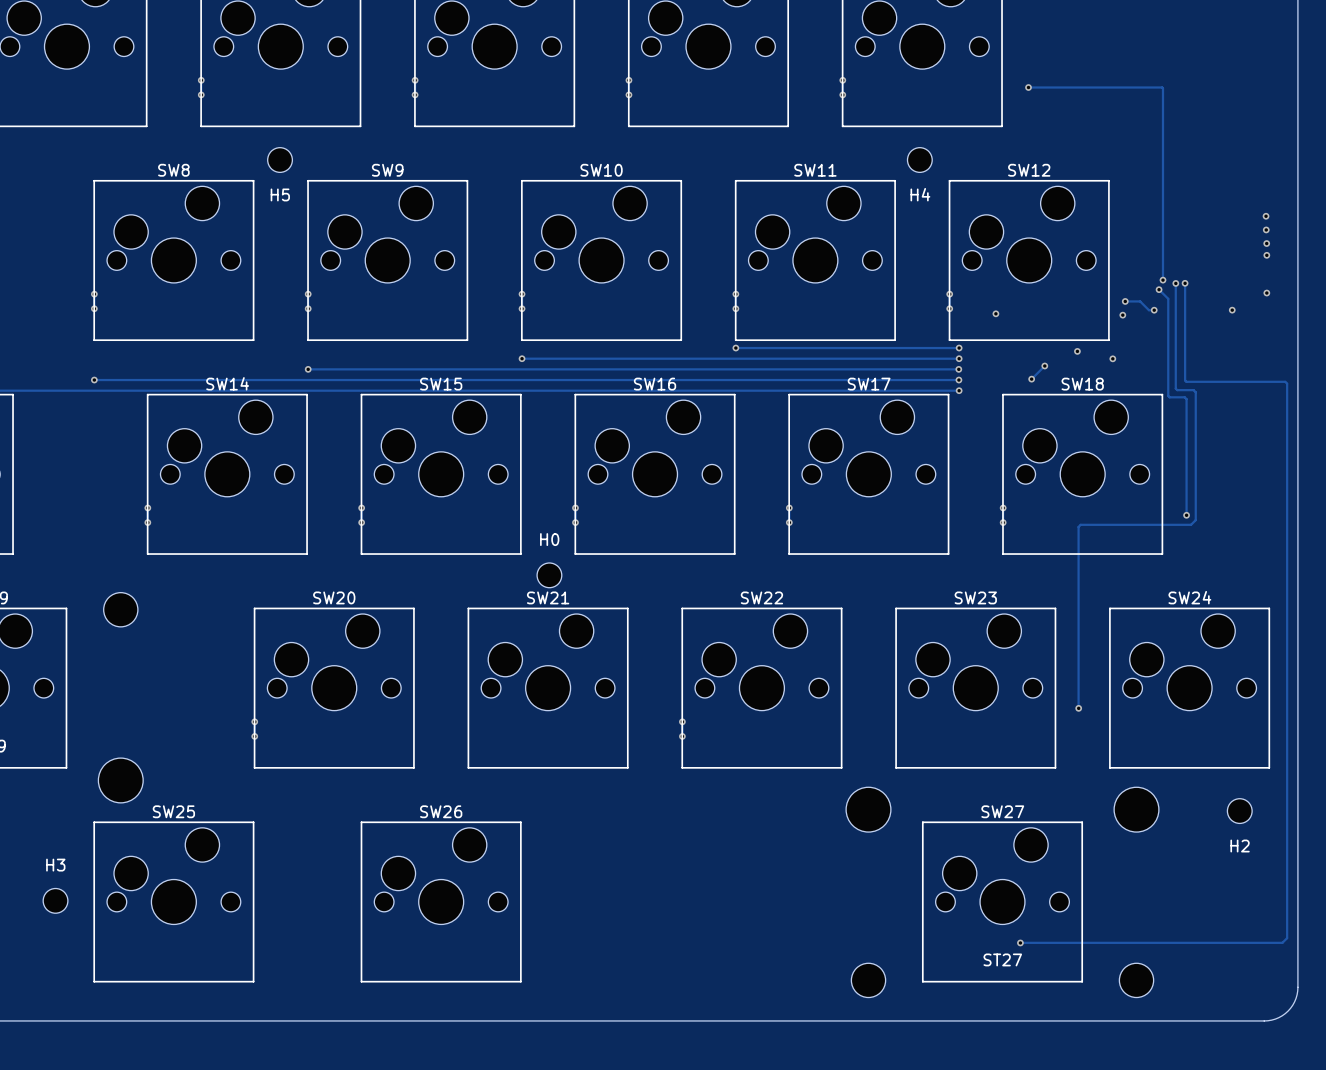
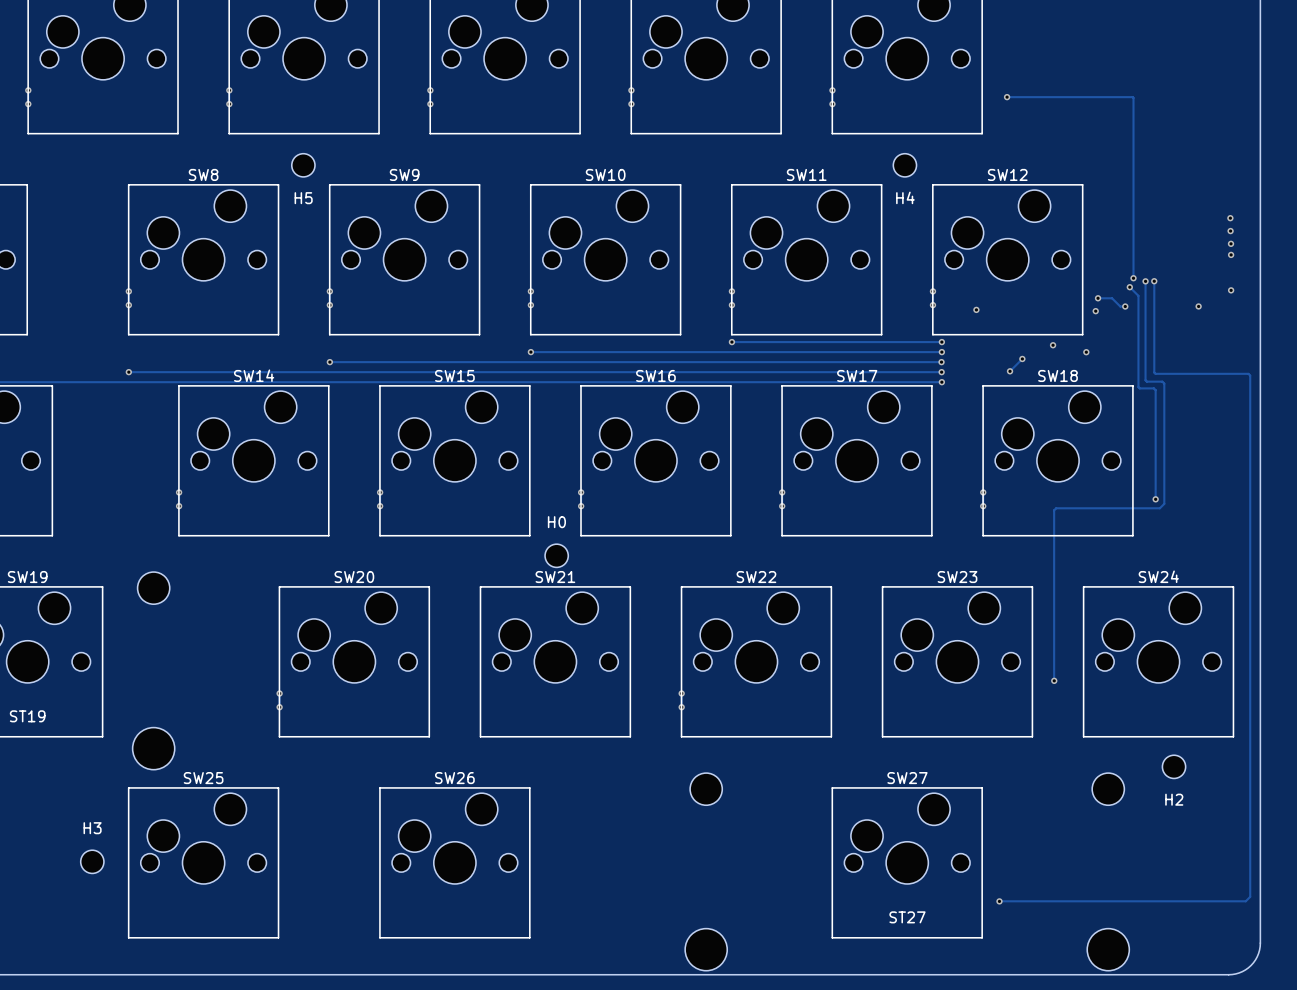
ST27 footprint: [846, 787, 1159, 998] -> [685, 773, 1130, 971]
H2 position: (1239, 811) -> (1174, 766)
SW27 position: (1002, 901) -> (907, 862)

